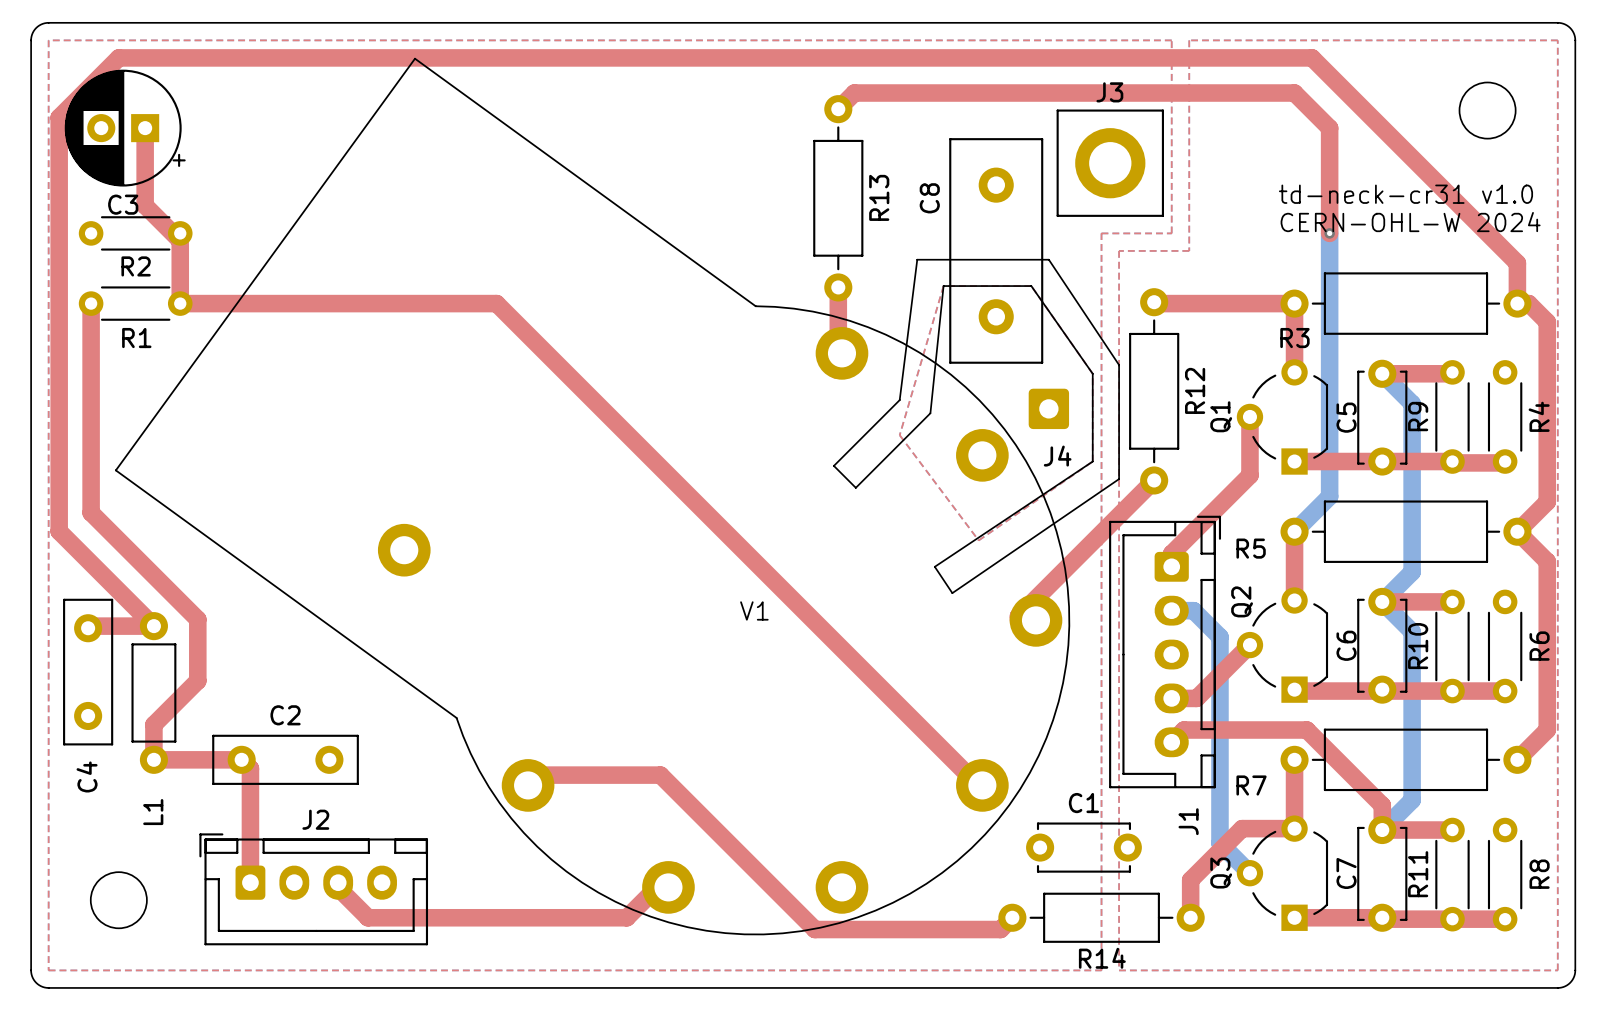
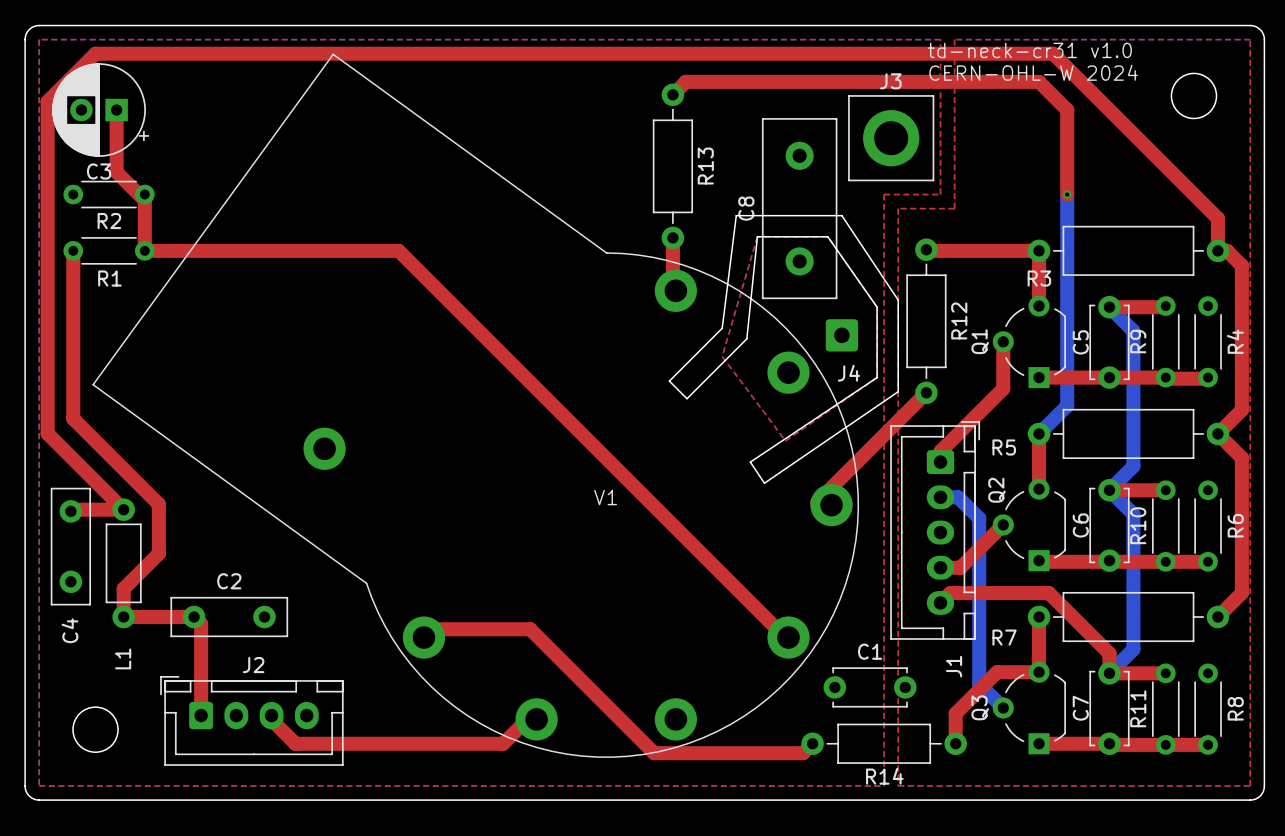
text position: td-neck-cr31 v1.0 (1406, 194) -> td-neck-cr31 v1.0 (1029, 50)
C8 name position: C8 (929, 198) -> C8 (746, 208)
text position: CERN-OHL-W 2024 (1410, 222) -> CERN-OHL-W 2024 (1033, 72)

